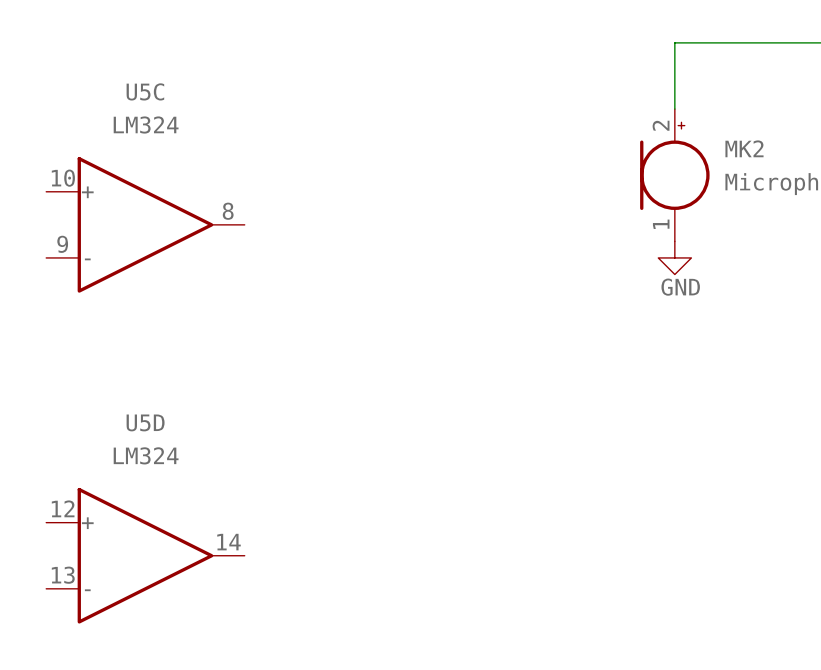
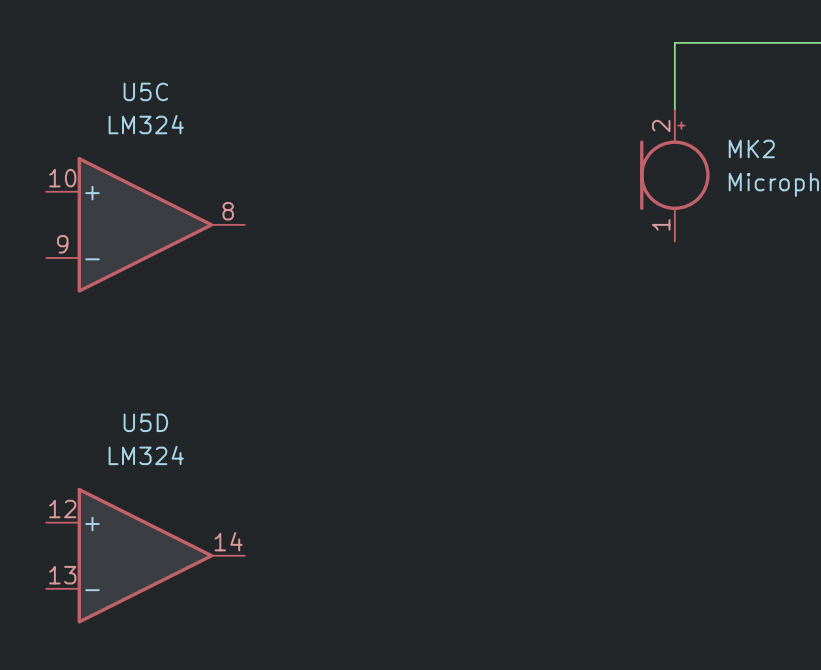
power symbol: GND (674, 257) -> none

